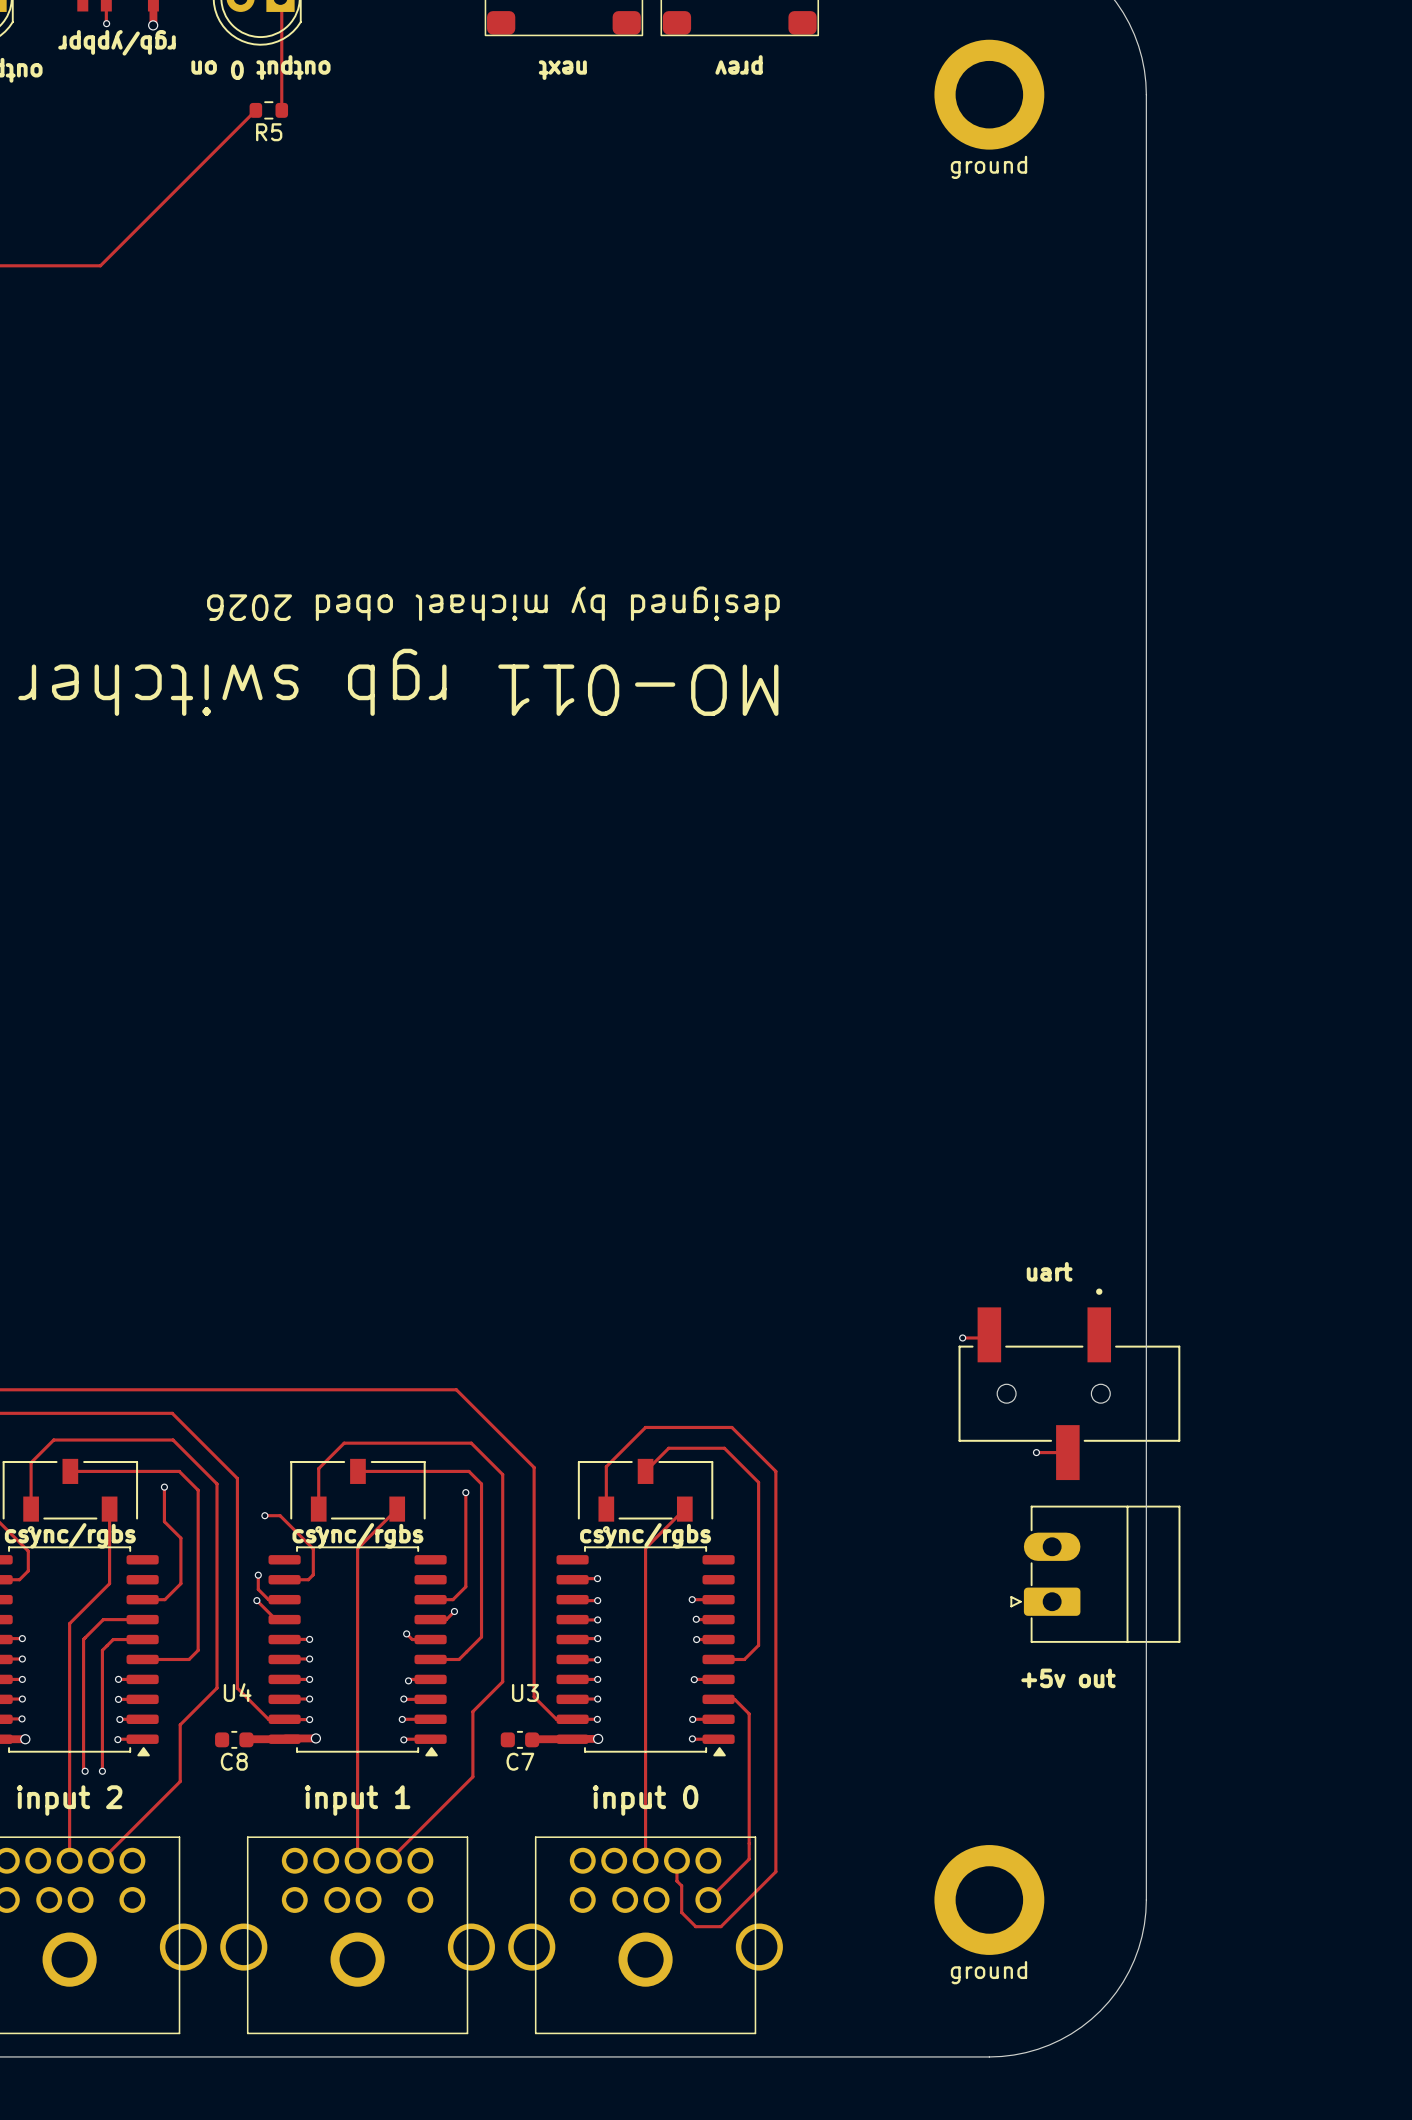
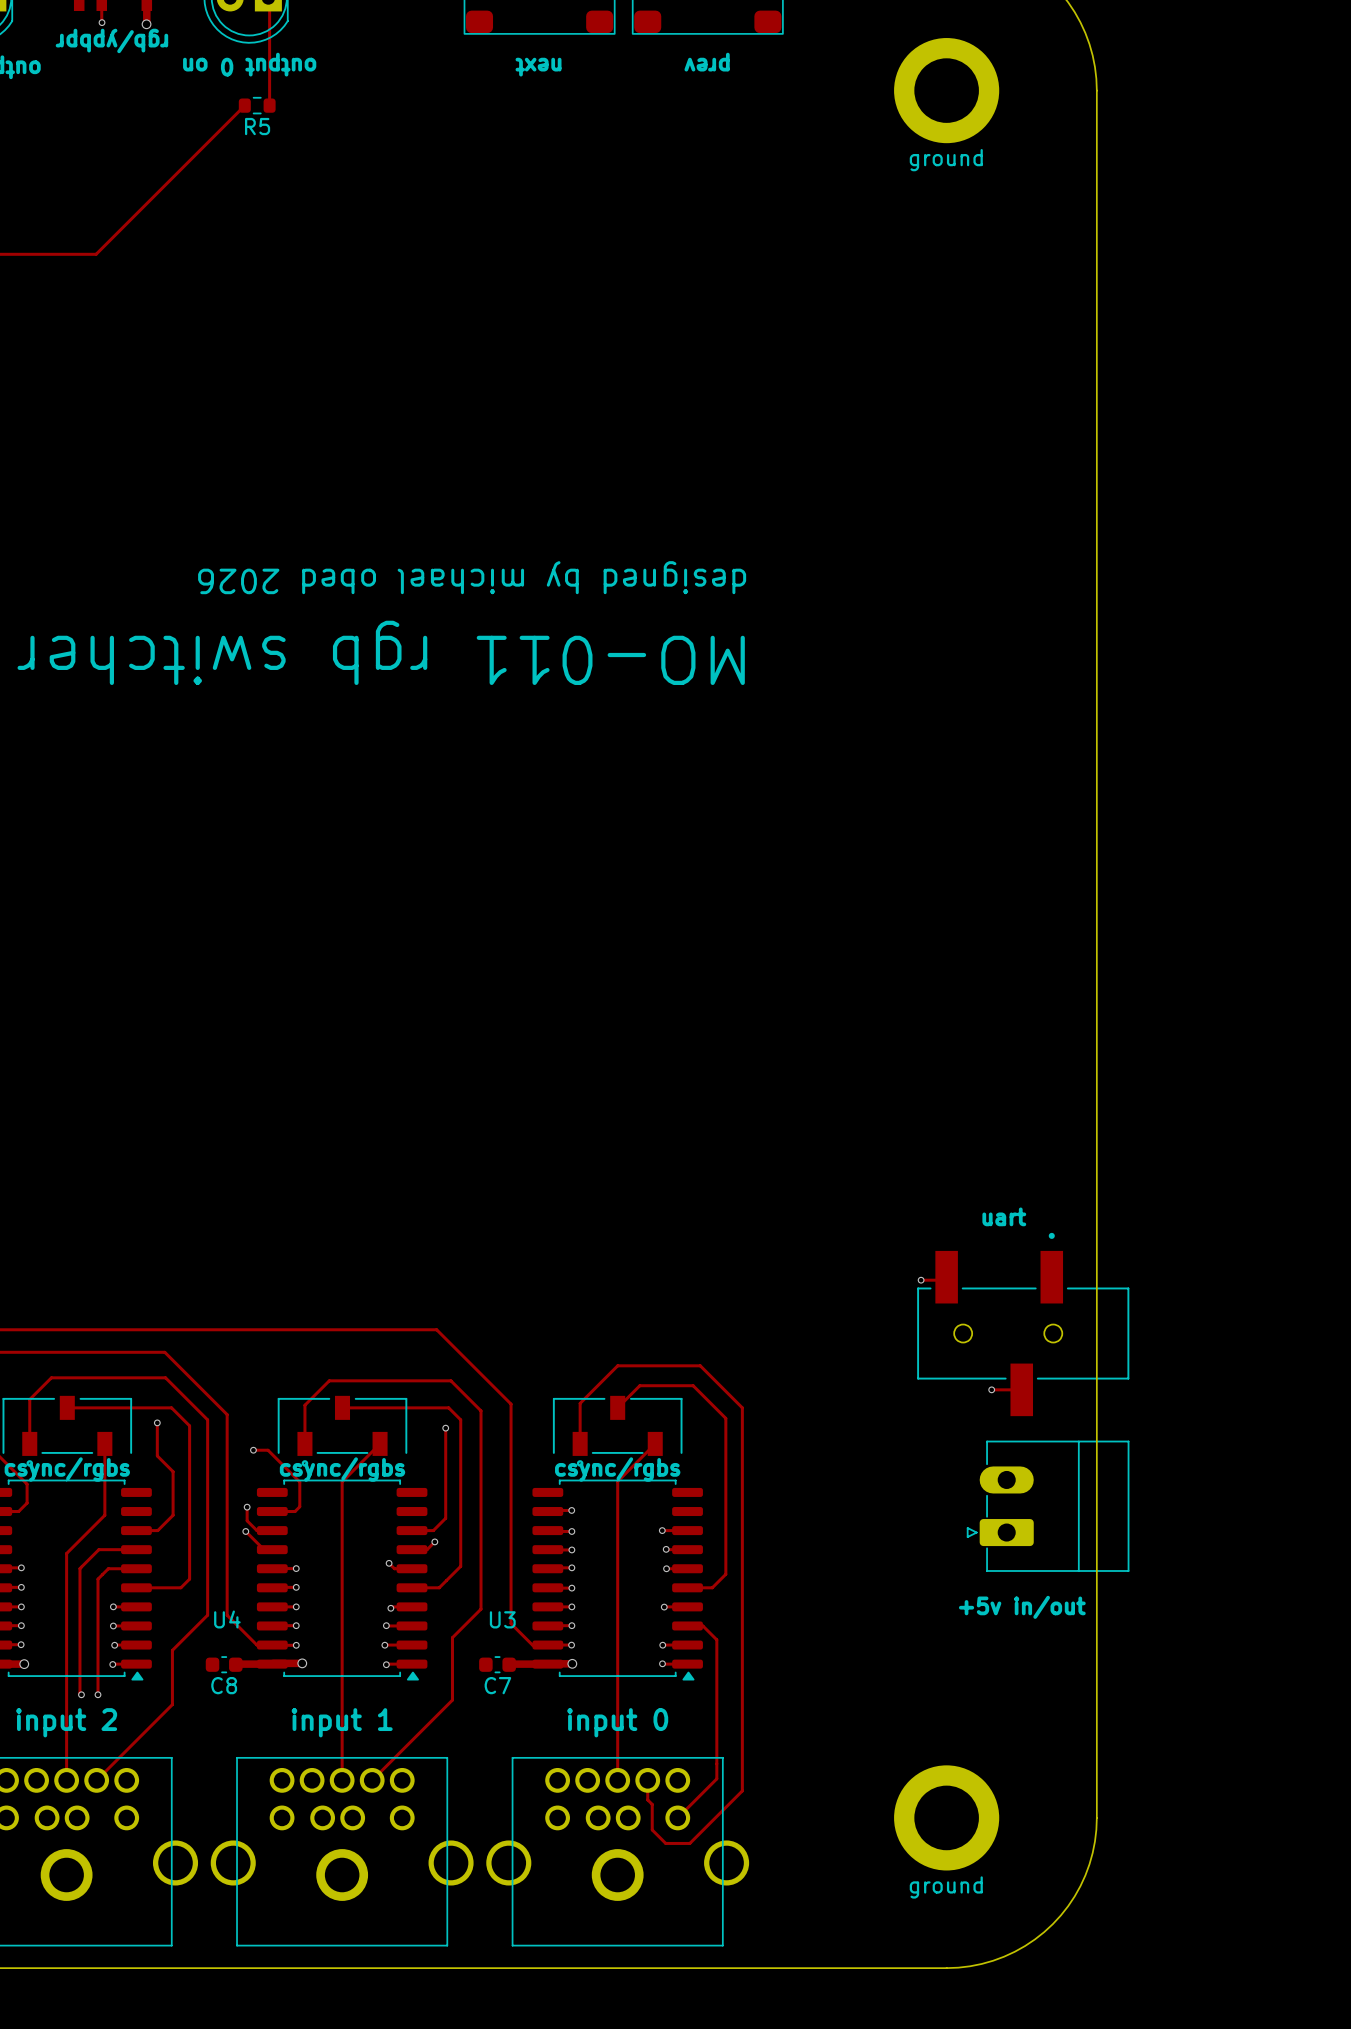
part value: +5v out (1068, 1678) -> +5v in/out (1022, 1607)

